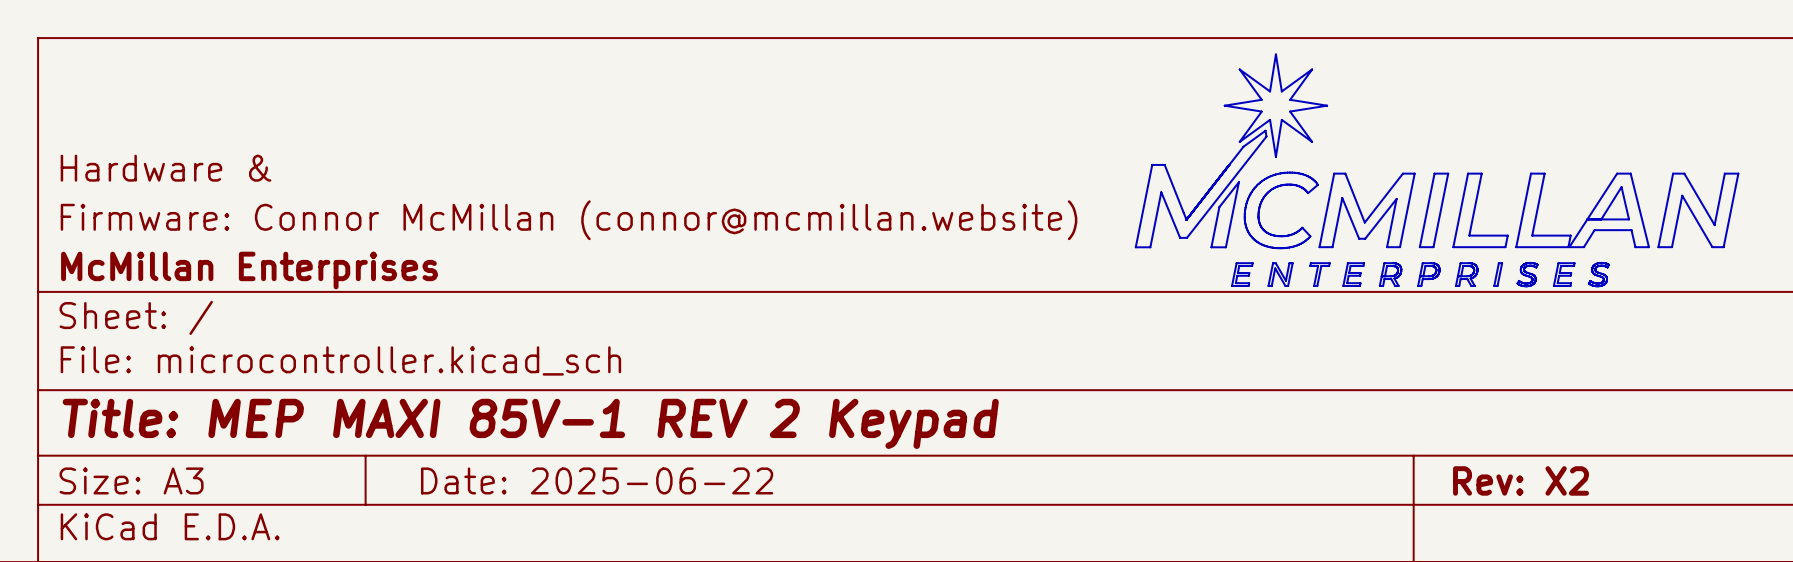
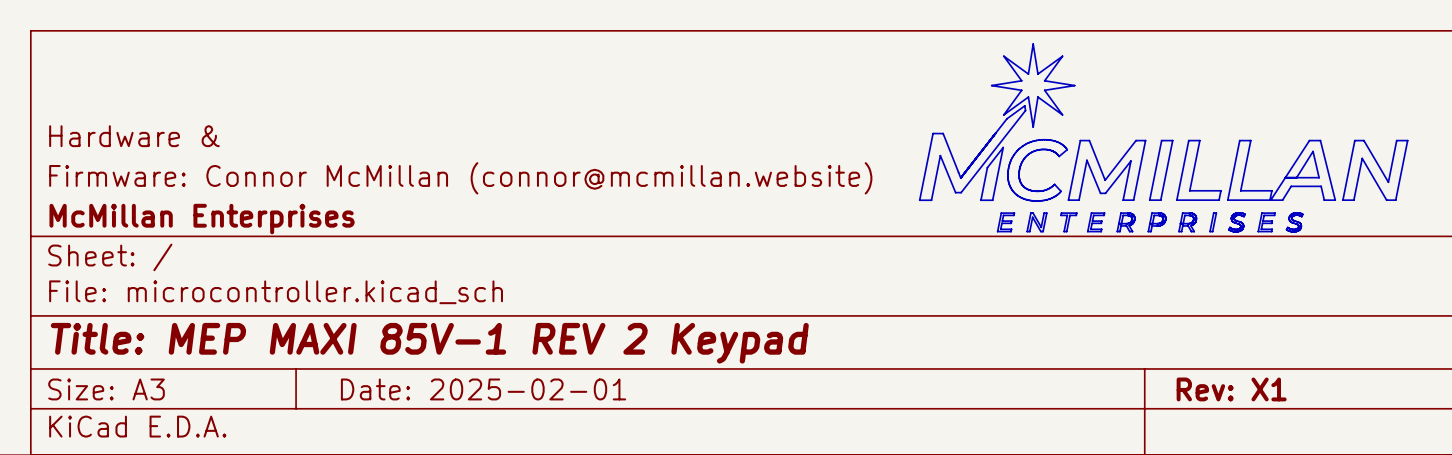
title block: Date: 2025-06-22 (597, 480) -> Date: 2025-02-01 (483, 389)
title block: Rev: X2 (1521, 480) -> Rev: X1 (1231, 389)

